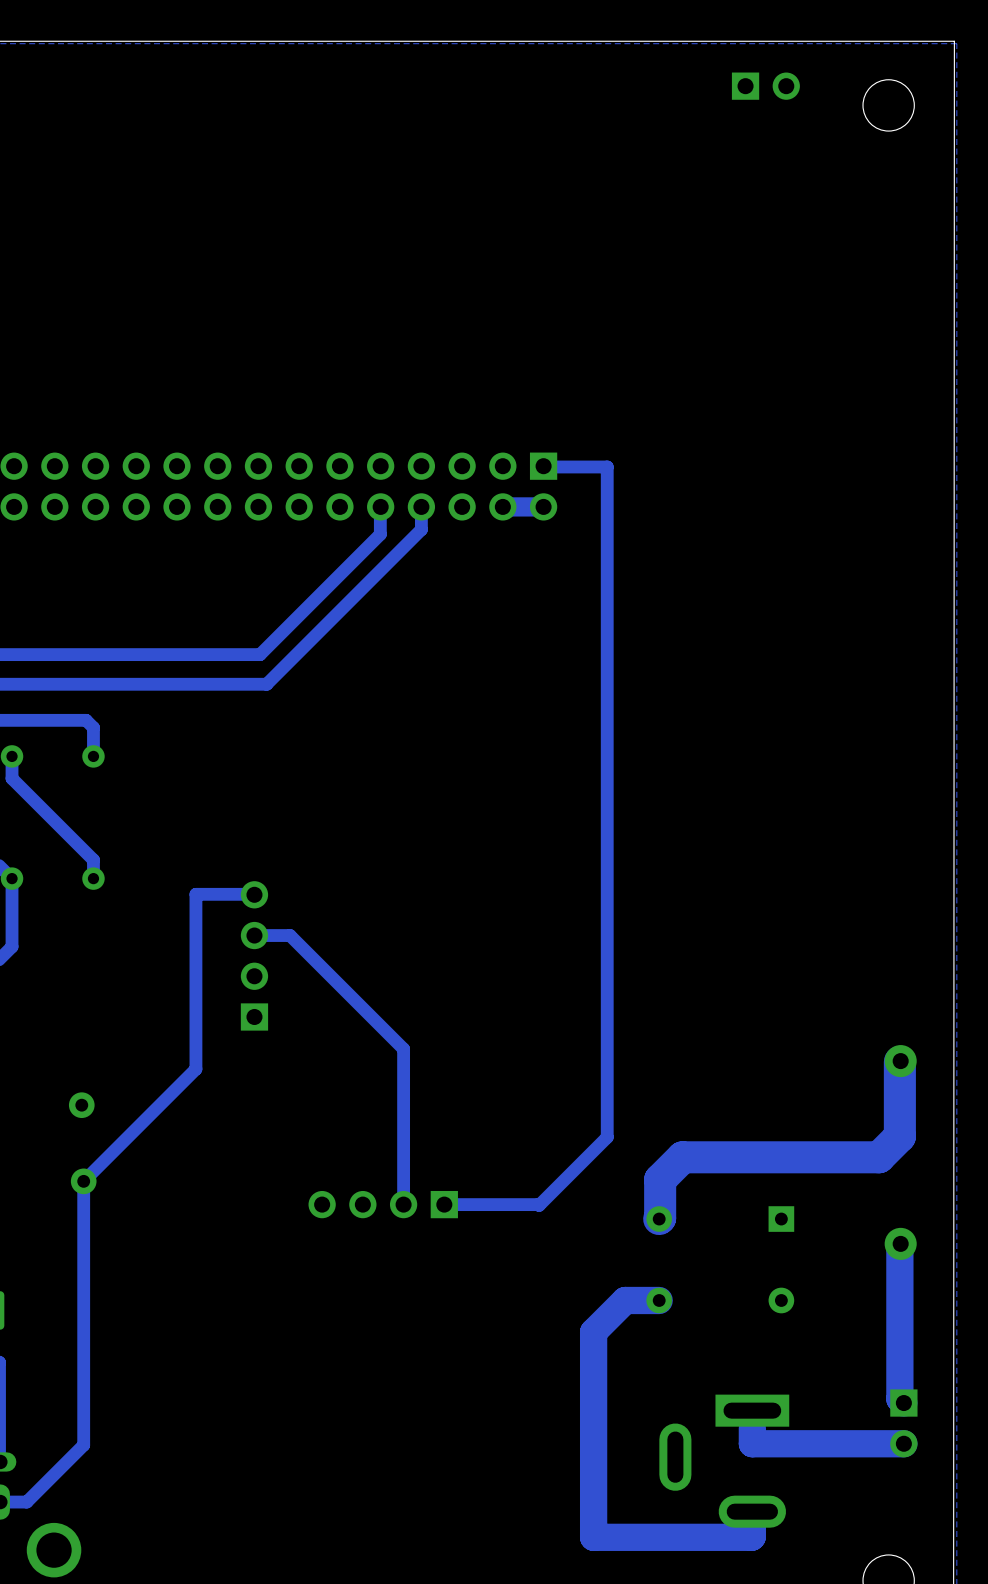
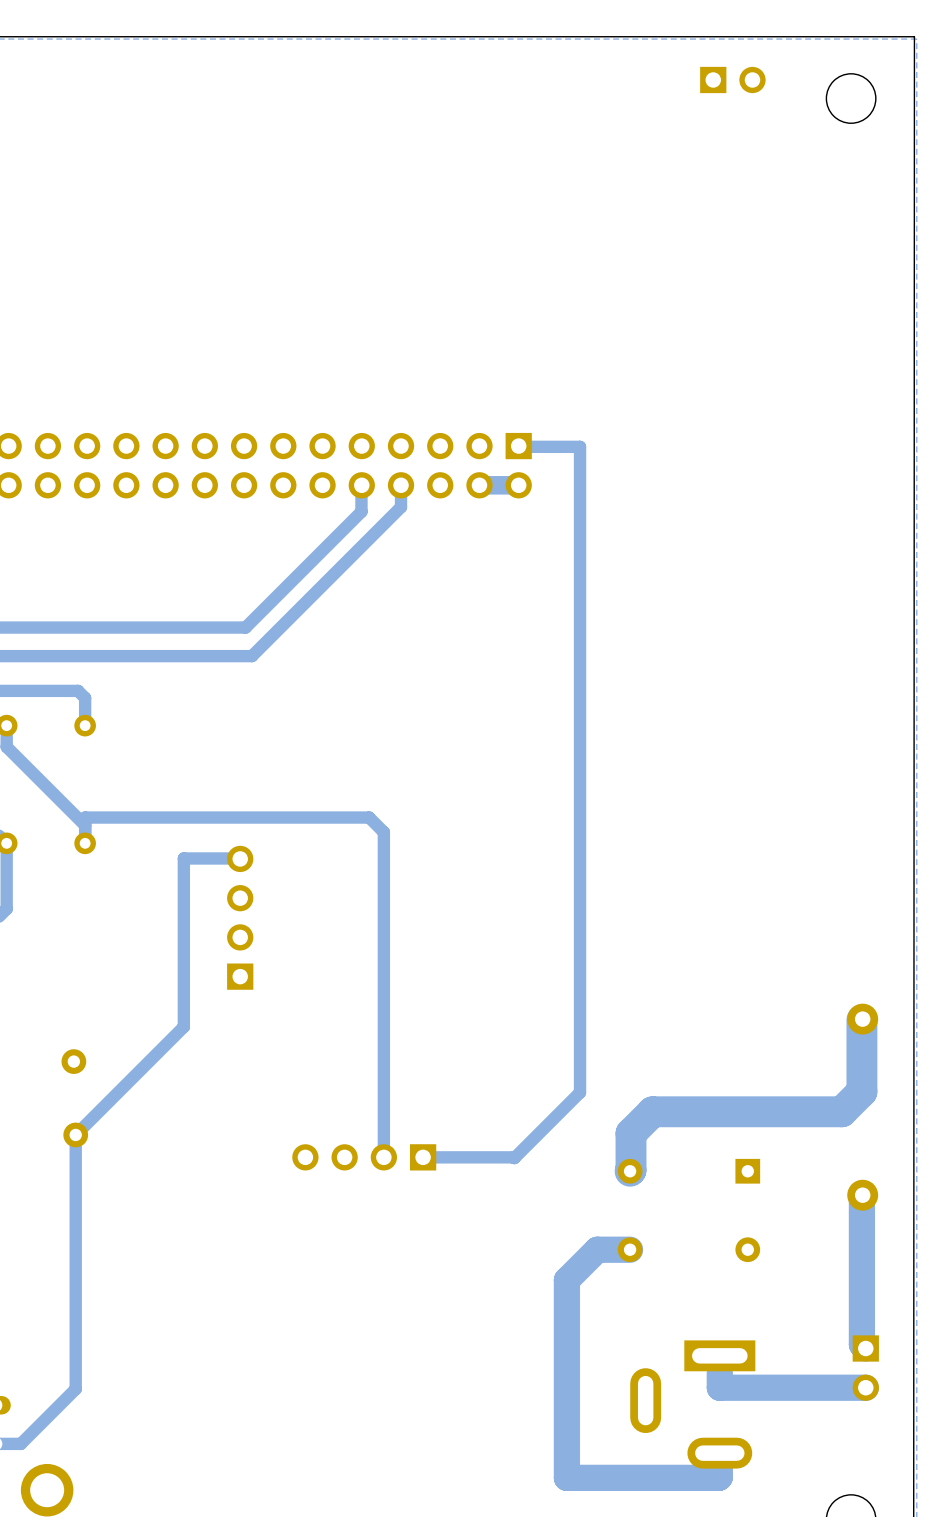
track: (254, 935) (290, 935) (403, 1049) -> (85, 825) (85, 817) (369, 817) (383, 832) (383, 1007)

